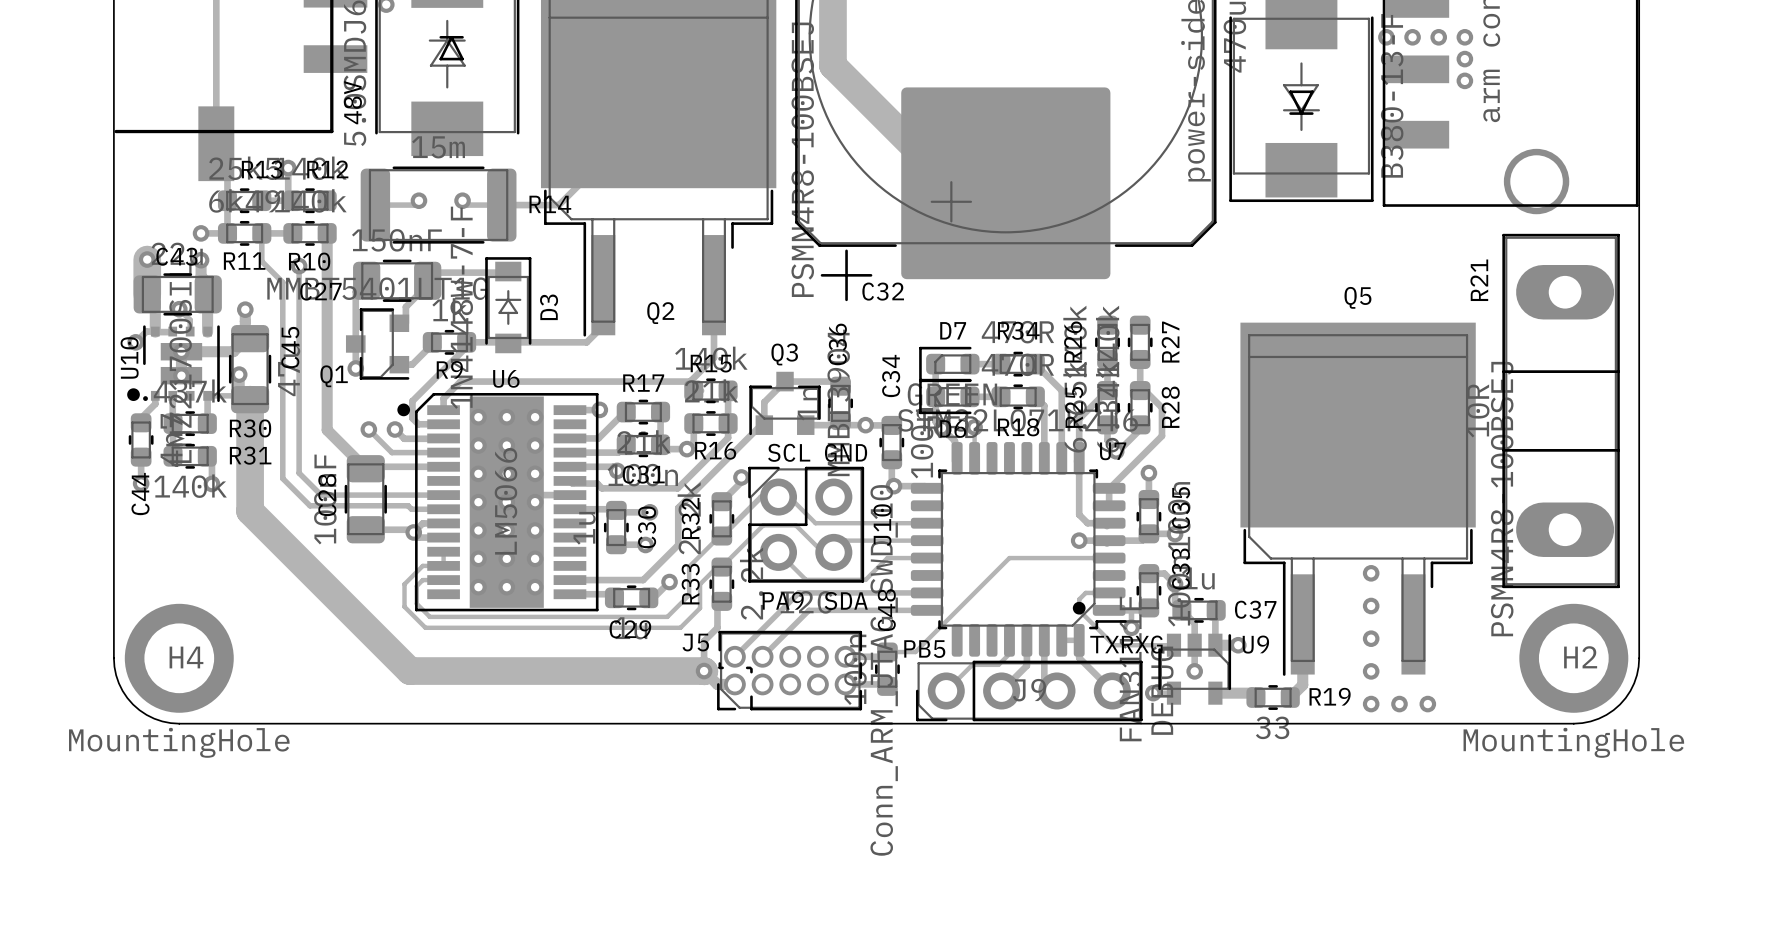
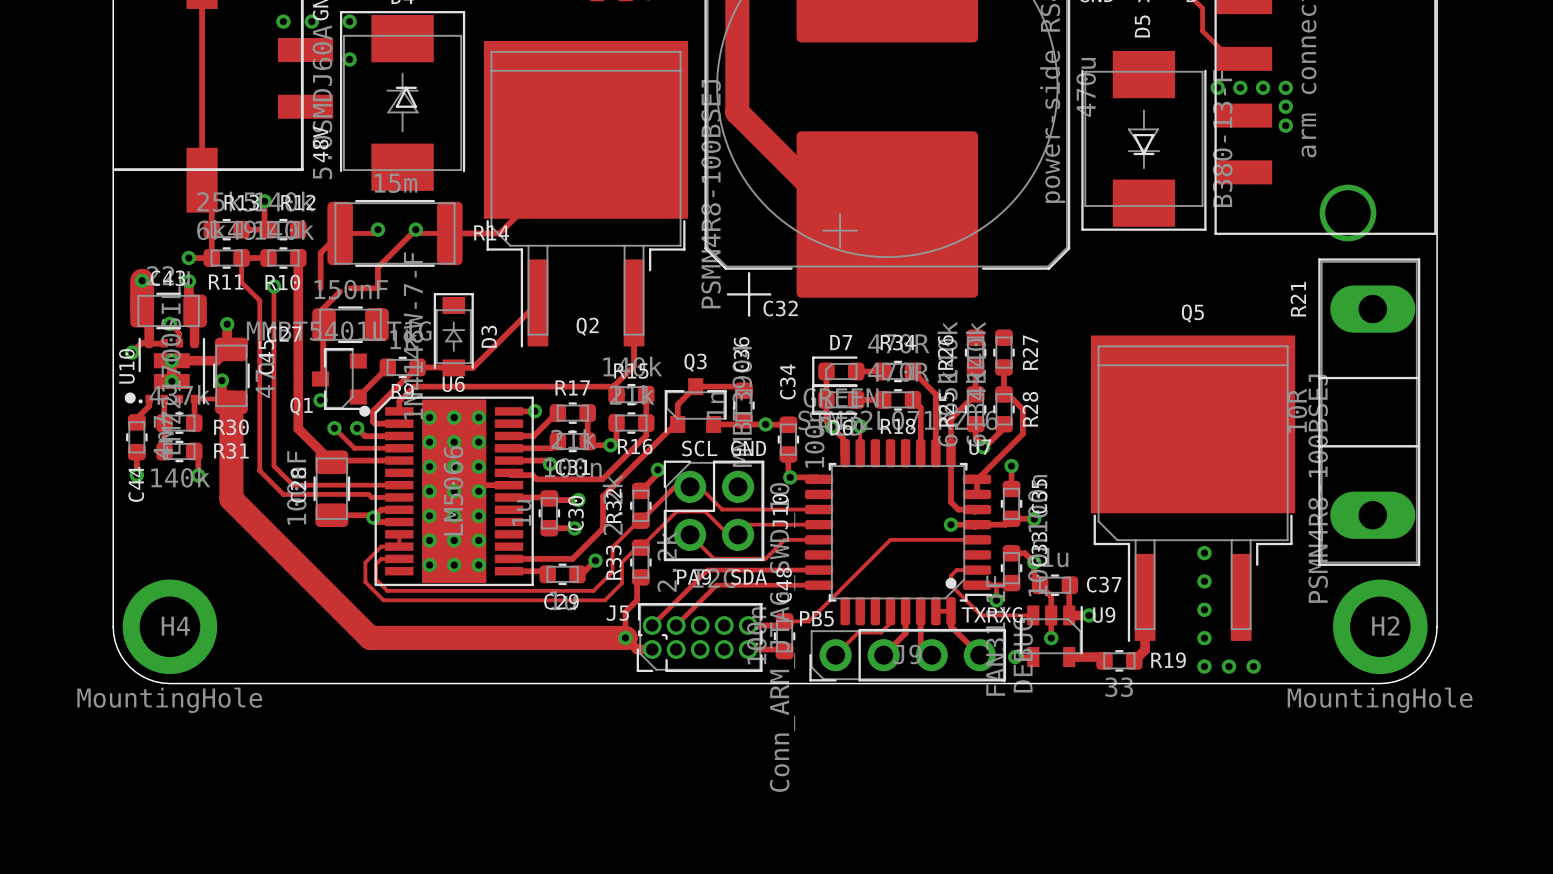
track: none -> (415, 229) (377, 267) (377, 288) (350, 288)
track: none -> (340, 233) (320, 252) (320, 288)
track: (499, 272) (435, 272) (427, 280) (427, 285) (405, 306) (405, 323) -> none
C27 position: (397, 280) -> (350, 324)
track: (603, 285) (603, 325) (586, 342) (468, 342) (468, 344) (412, 401) (412, 418) (418, 424) -> (537, 302) (472, 367) (416, 367) (373, 411) (373, 421) (377, 423)
D3 position: (508, 305) -> (453, 334)
track: (434, 342) (412, 364) (399, 364) -> none
R9 position: (449, 342) -> (402, 367)
Q1 position: (377, 343) -> (339, 378)
track: none -> (387, 367) (358, 396)
via position: (355, 368) -> (320, 400)

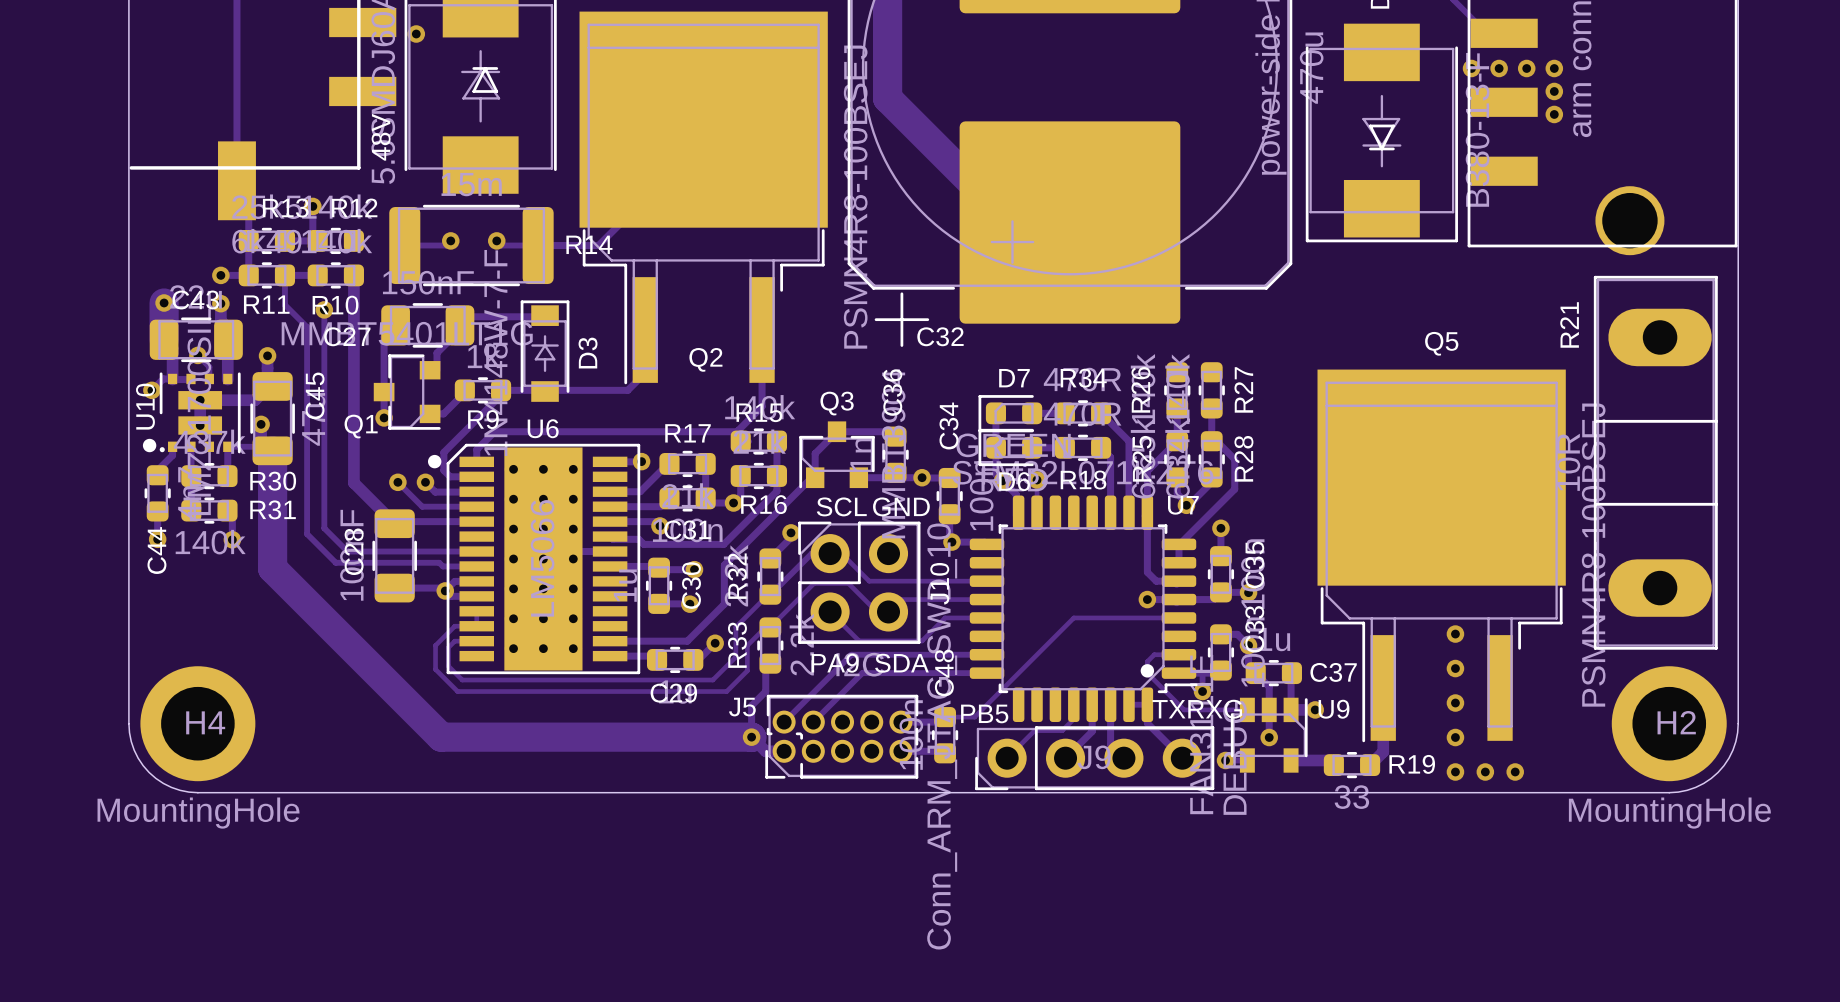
track: (415, 229) (377, 267) (377, 288) (350, 288) -> none
track: (340, 233) (320, 252) (320, 288) -> none
track: none -> (535, 316) (468, 316) (459, 325) (459, 330) (436, 352) (436, 370)
track: (537, 302) (472, 367) (416, 367) (373, 411) (373, 421) (377, 423) -> (645, 330) (645, 372) (627, 390) (503, 390) (503, 392) (443, 452) (443, 470) (450, 476)
C27 position: (350, 324) -> (427, 325)
D3 position: (453, 334) -> (545, 351)
track: none -> (467, 390) (443, 413) (430, 413)
track: (387, 367) (358, 396) -> none
R9 position: (402, 367) -> (482, 390)
Q1 position: (339, 378) -> (407, 392)
via position: (320, 400) -> (384, 417)

